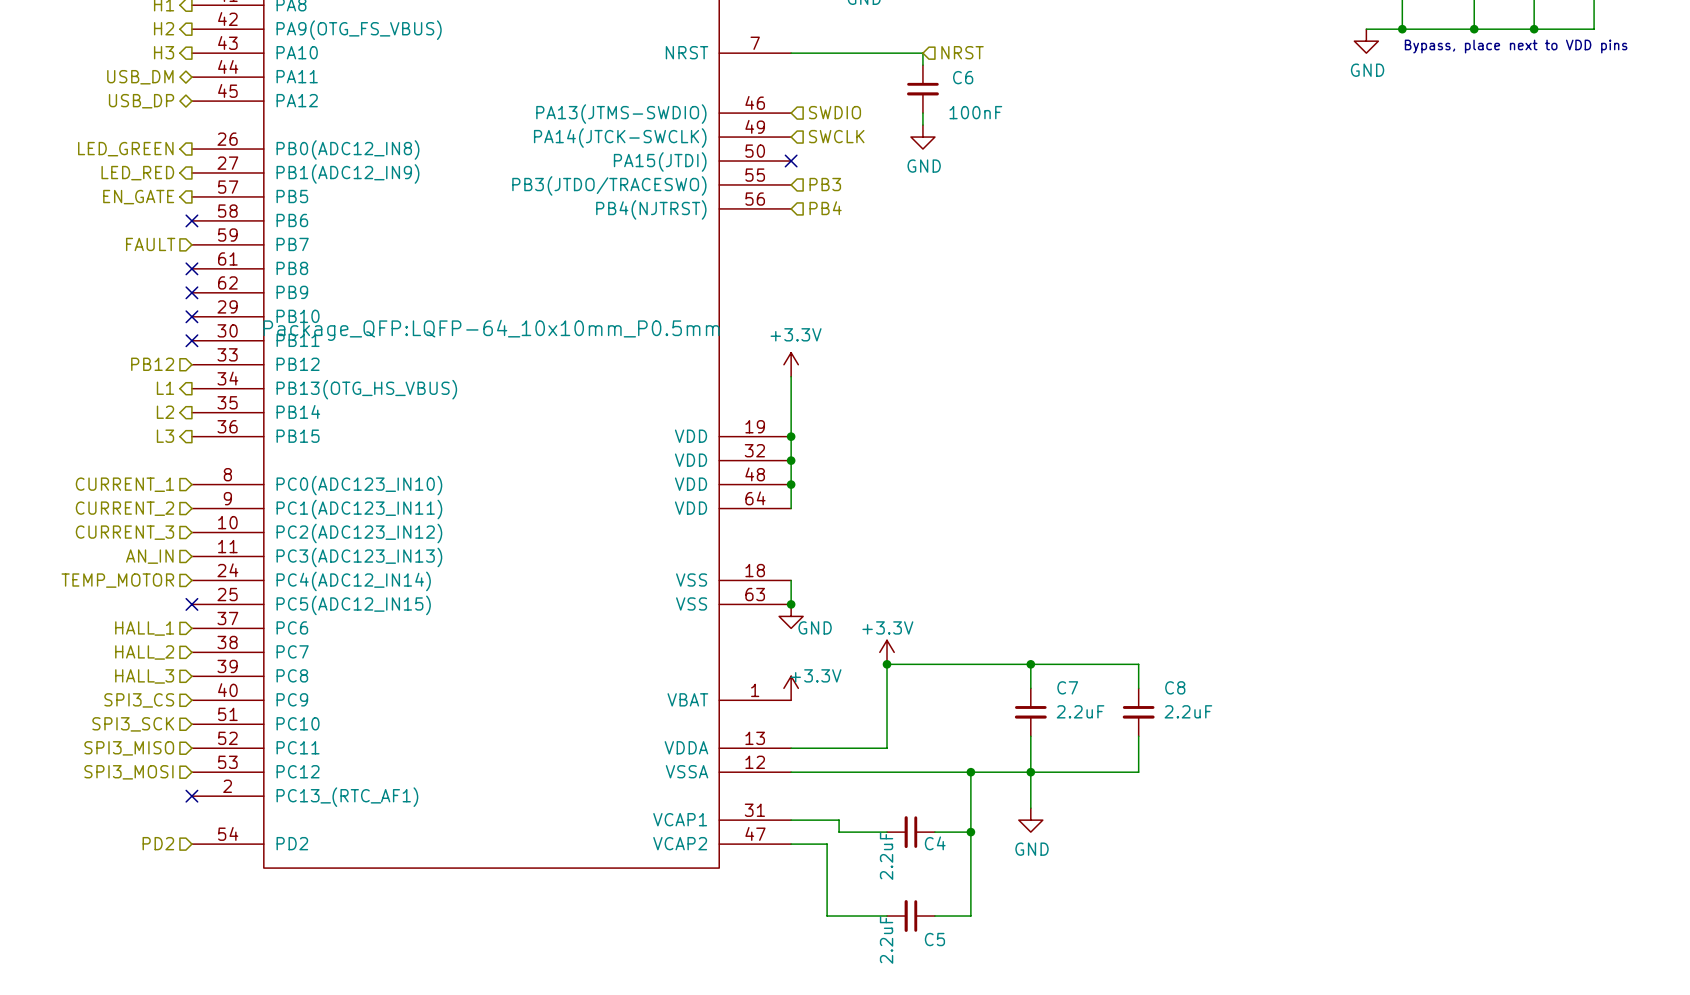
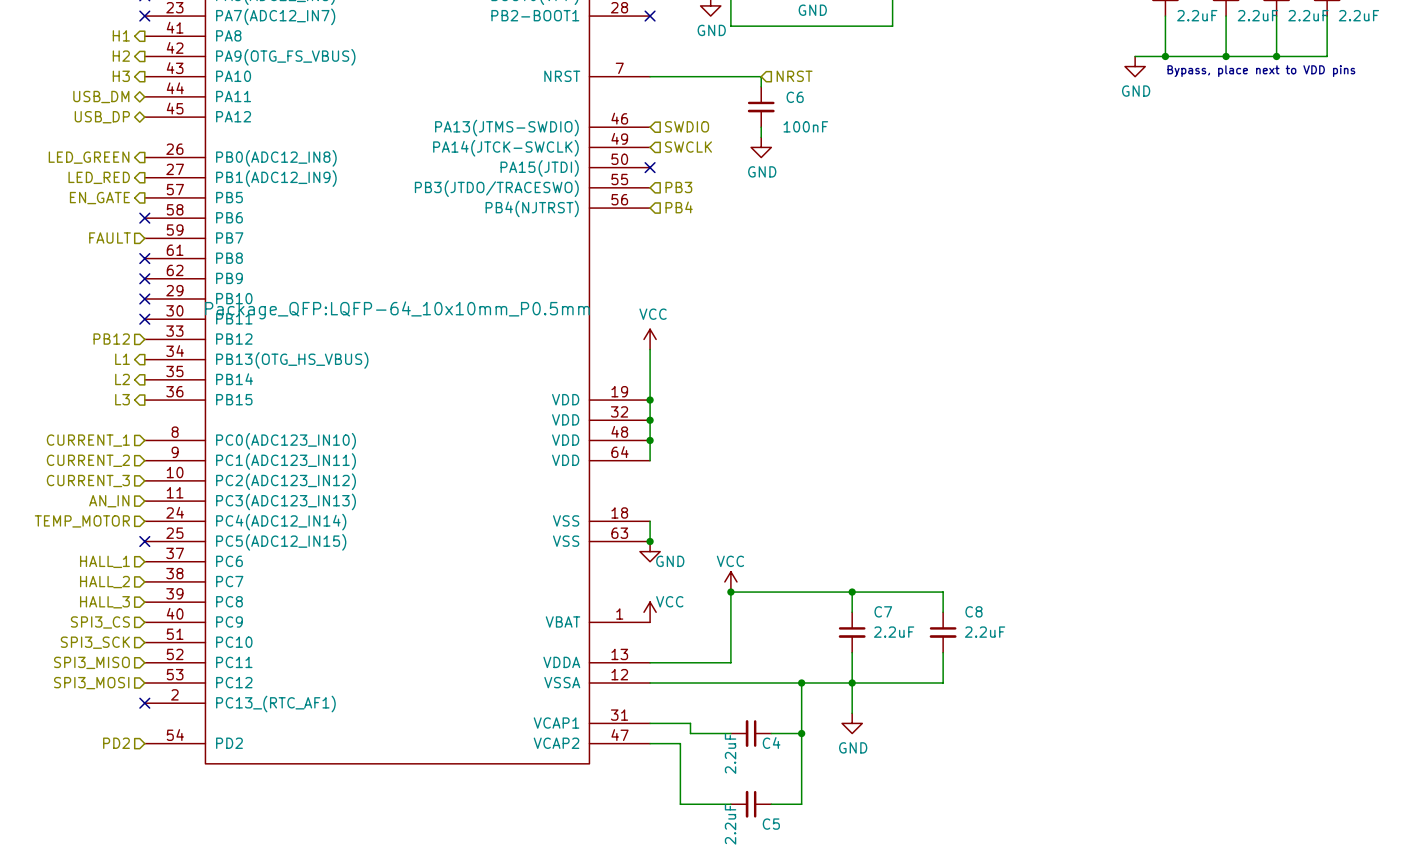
power symbol: +3.3V (791, 364) -> VCC (650, 339)
power symbol: +3.3V (887, 652) -> VCC (730, 581)
power symbol: +3.3V (791, 688) -> VCC (650, 612)

